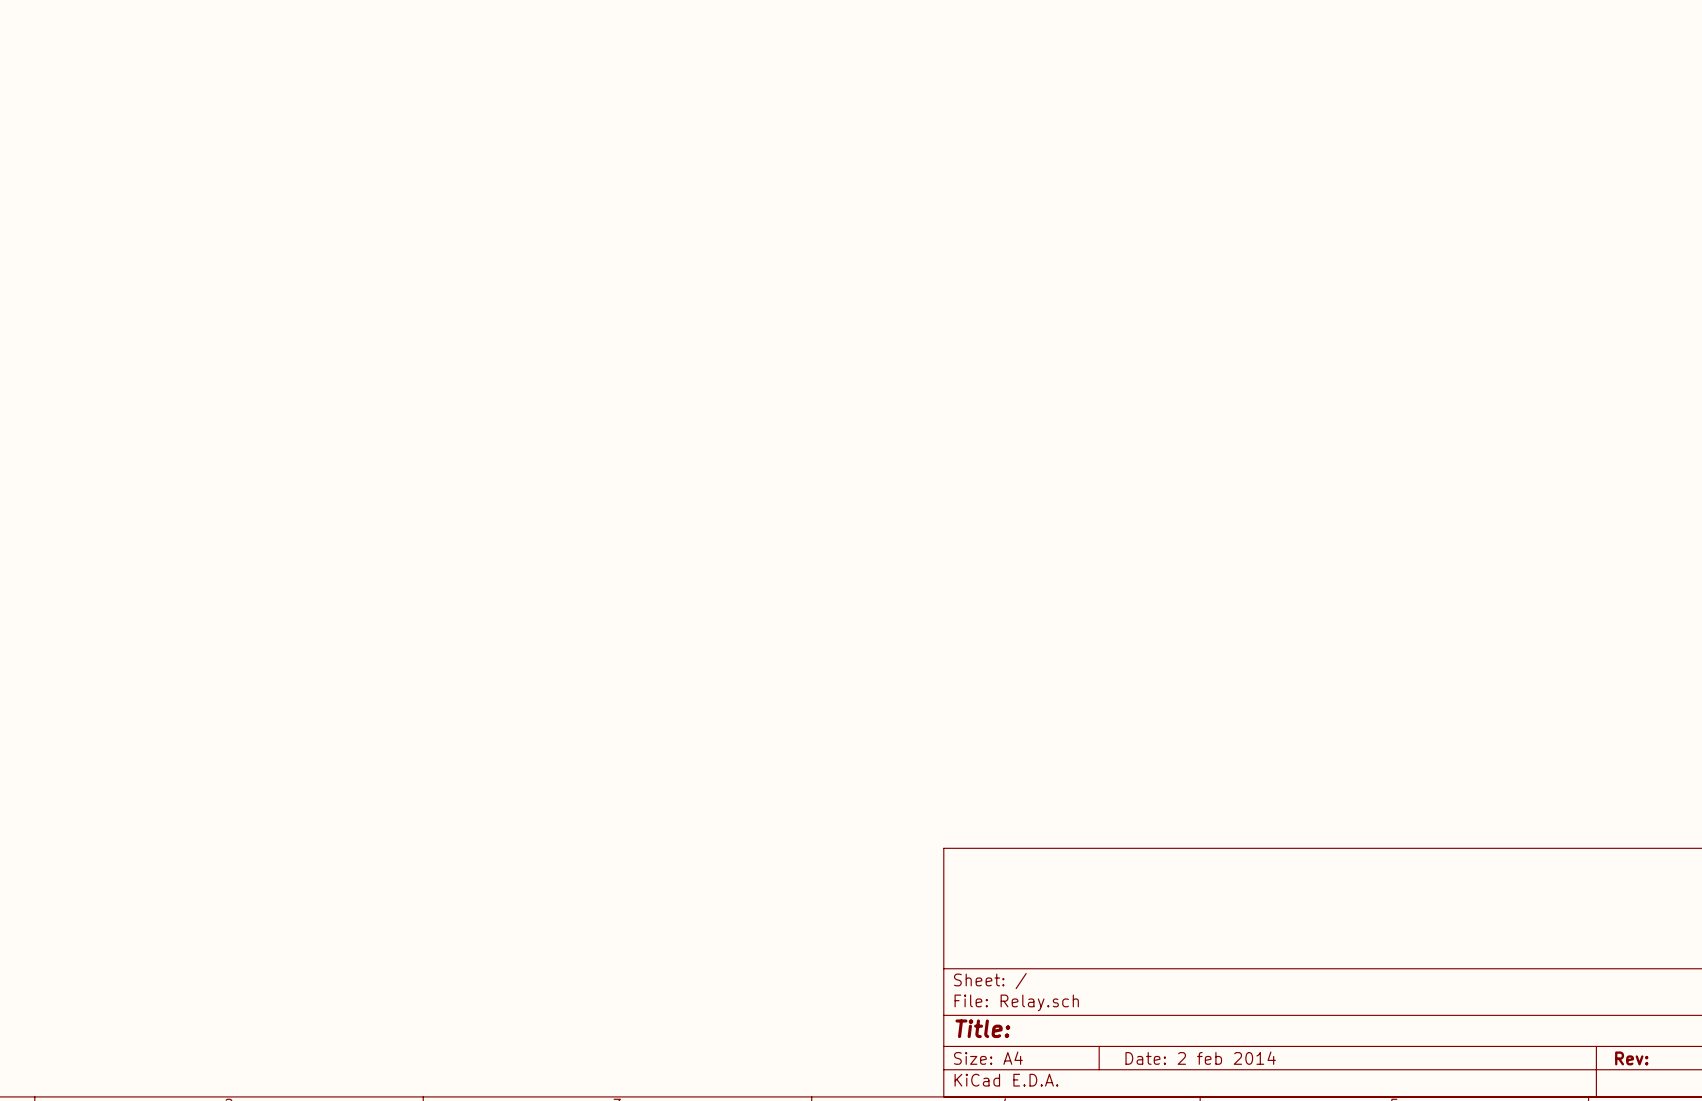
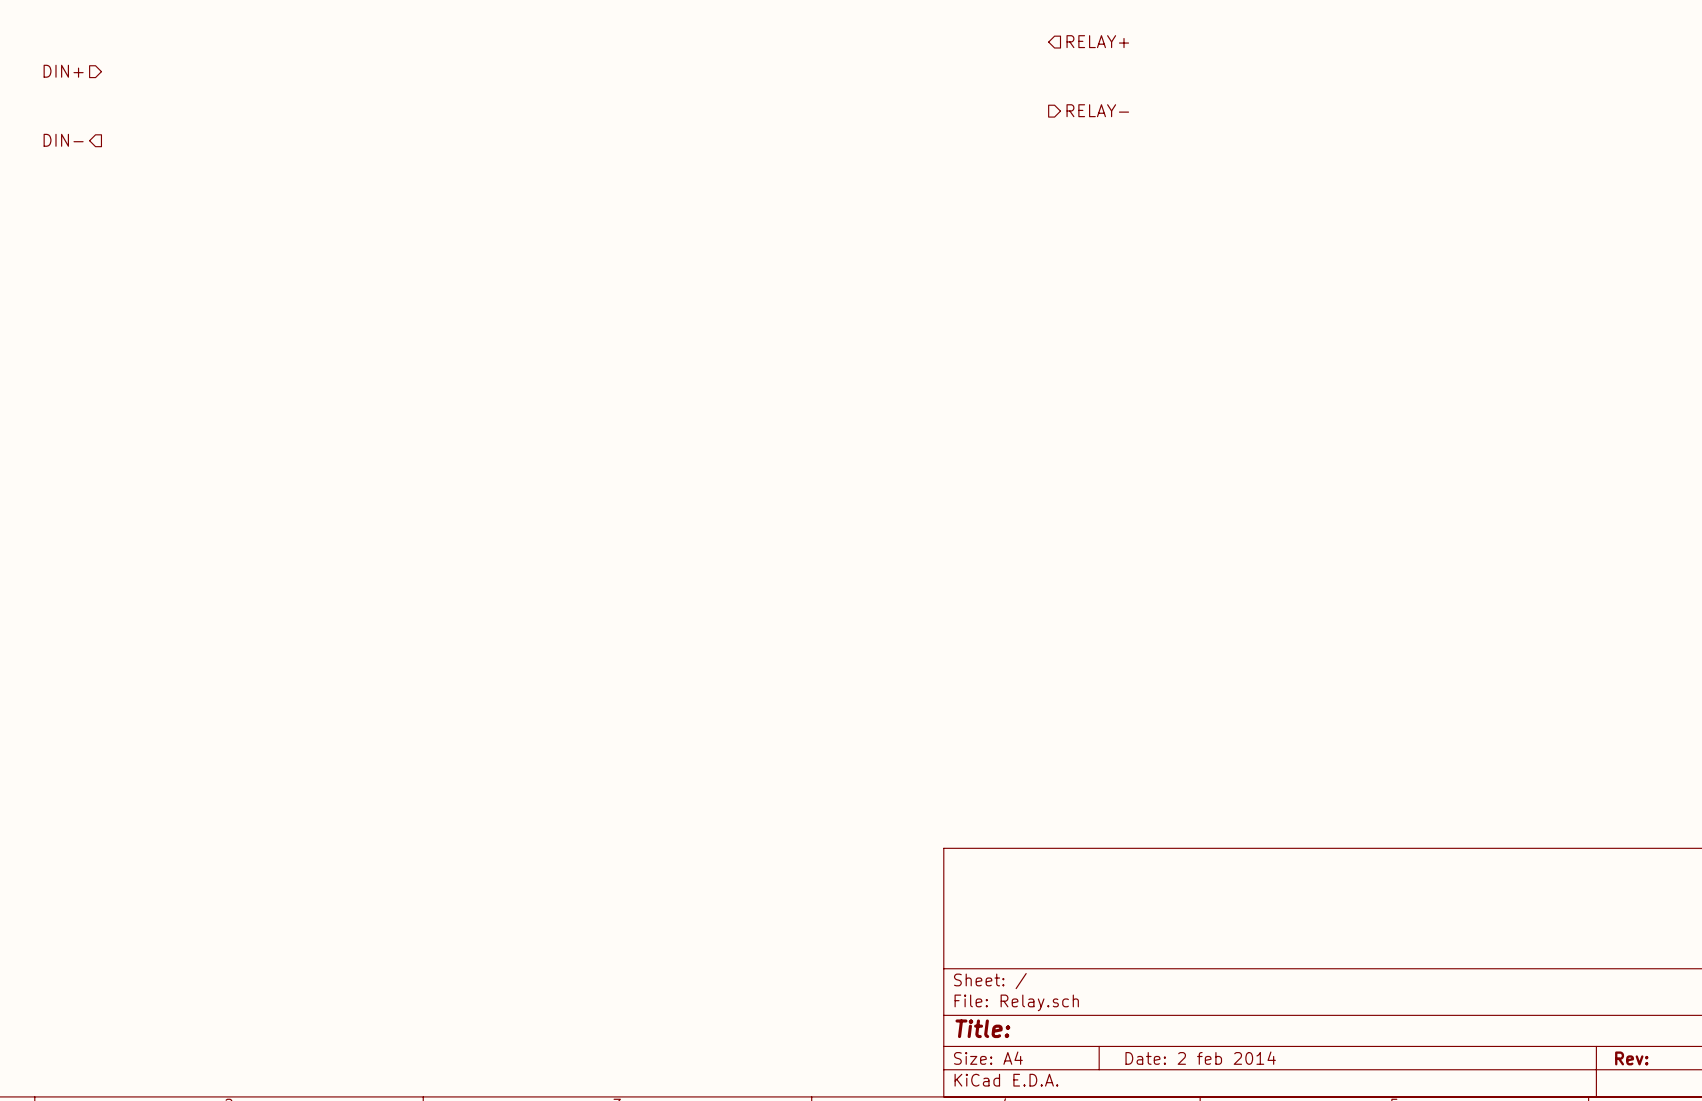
hierarchical label: none -> RELAY+ (1097, 41)
hierarchical label: none -> DIN+ (63, 71)
hierarchical label: none -> RELAY- (1097, 110)
hierarchical label: none -> DIN- (63, 140)

